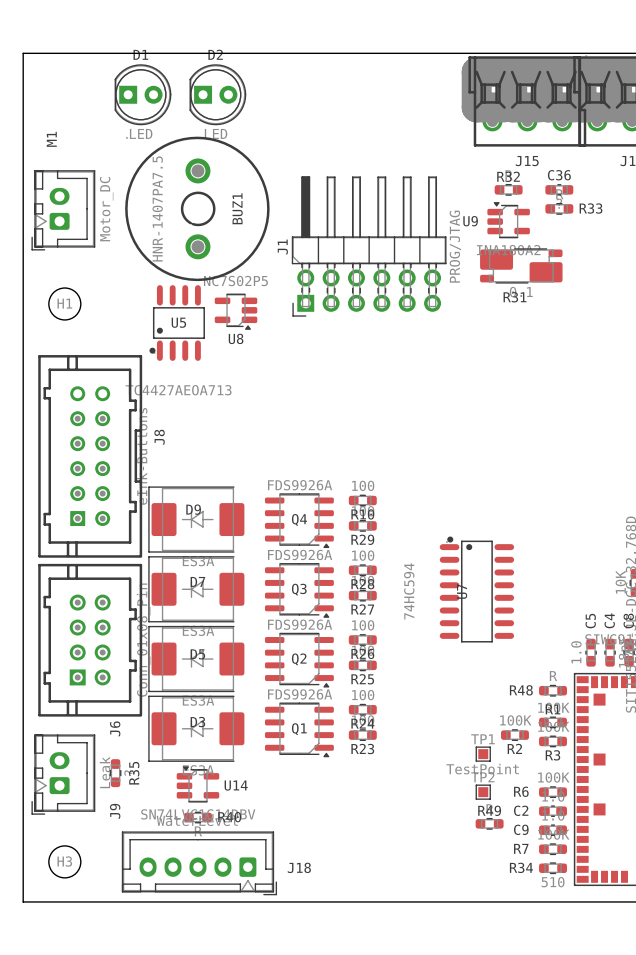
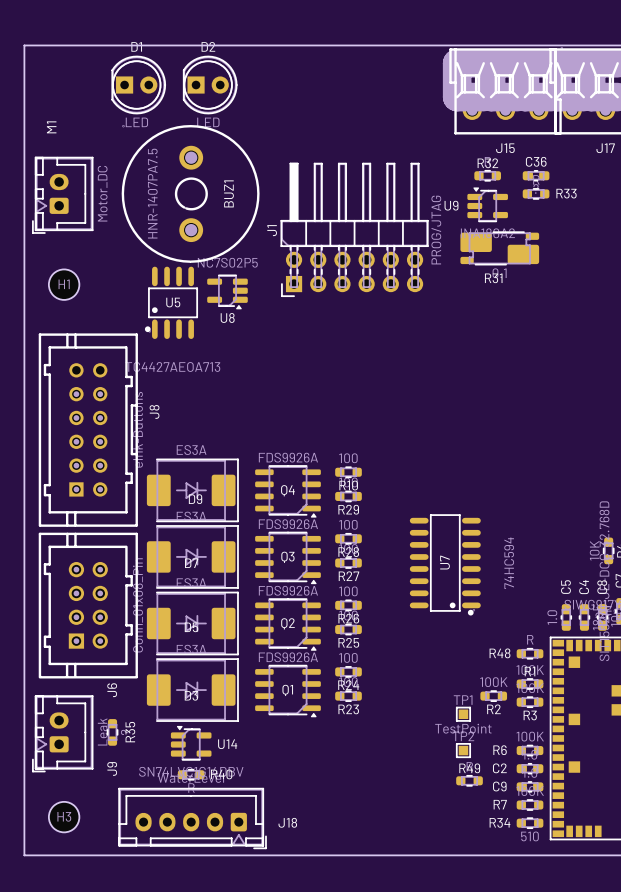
D9 rotation: 0° (196, 519) -> 180° (192, 490)
D7 rotation: 0° (196, 589) -> 180° (192, 556)
U7 rotation: 0° (476, 589) -> 180° (445, 564)
D5 rotation: 0° (196, 659) -> 180° (192, 623)
D3 rotation: 0° (196, 728) -> 180° (192, 690)

